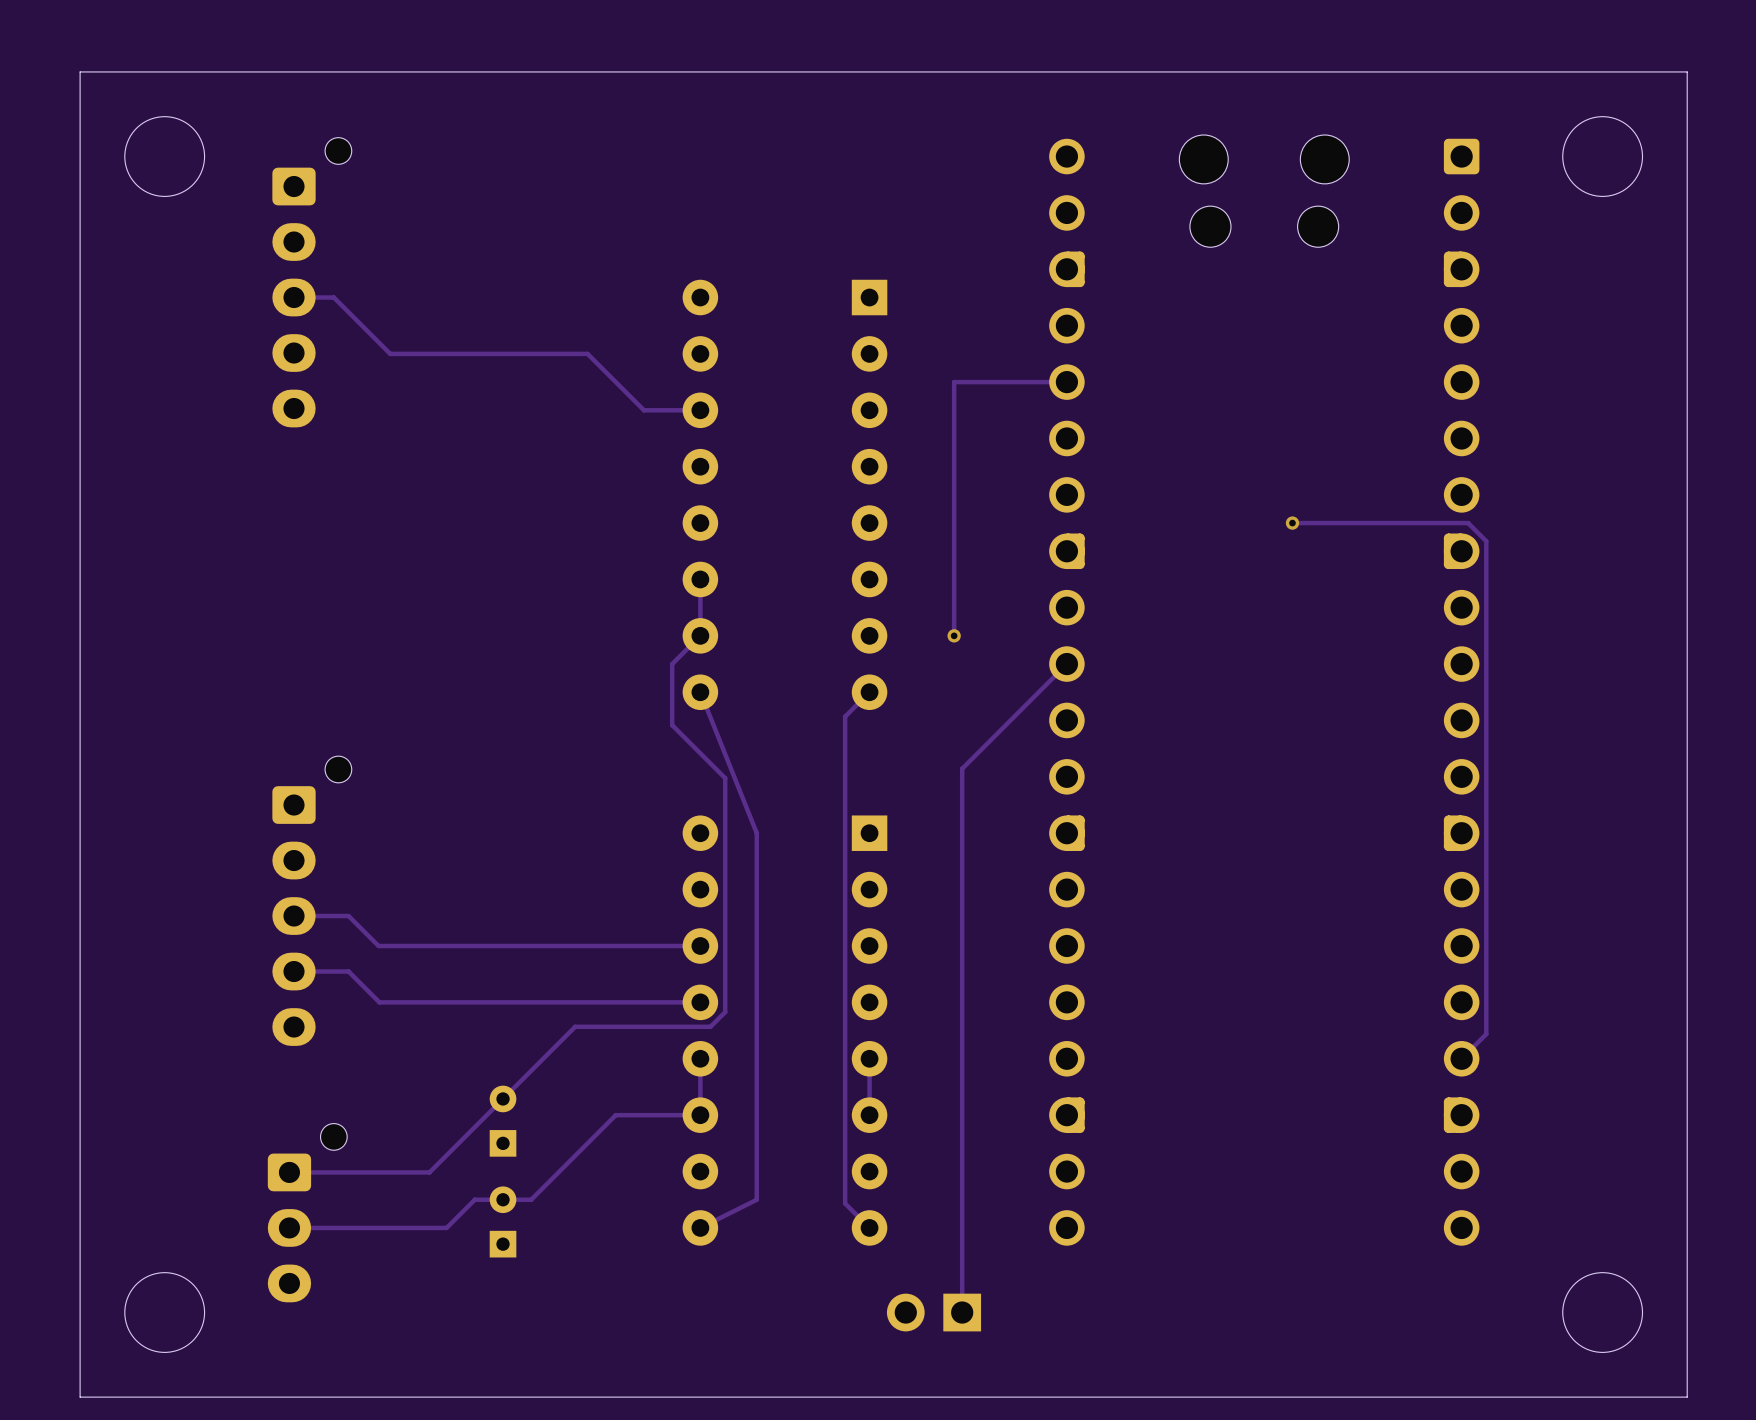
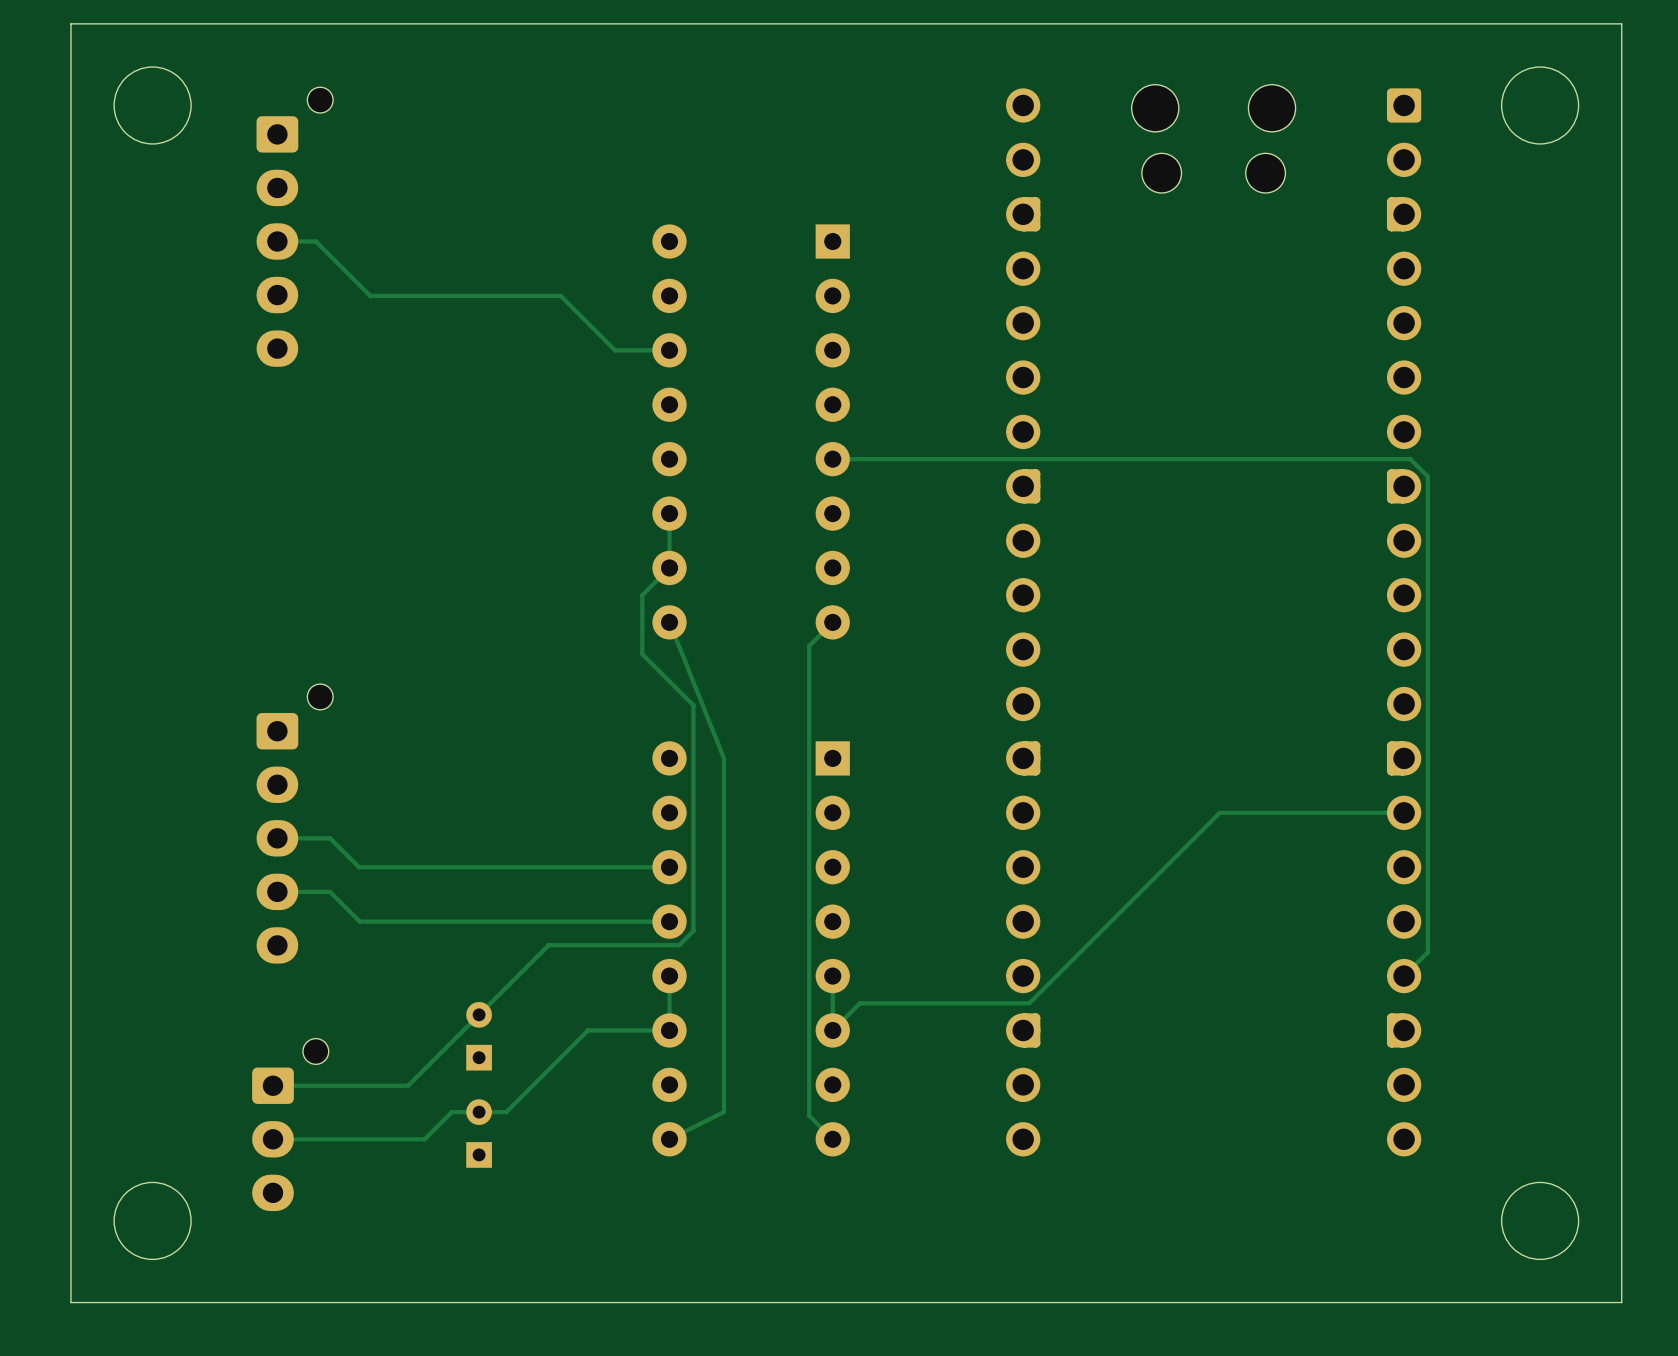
track: (1066, 382) (954, 382) (954, 635) -> none
track: none -> (1240, 459) (832, 459)
via: (1292, 523) -> none
via: (954, 635) -> none
track: (1066, 664) (962, 768) (962, 1312) -> none
track: none -> (1404, 812) (1219, 812) (1029, 1003) (859, 1003) (832, 1030)
part: (933, 1312) -> none

